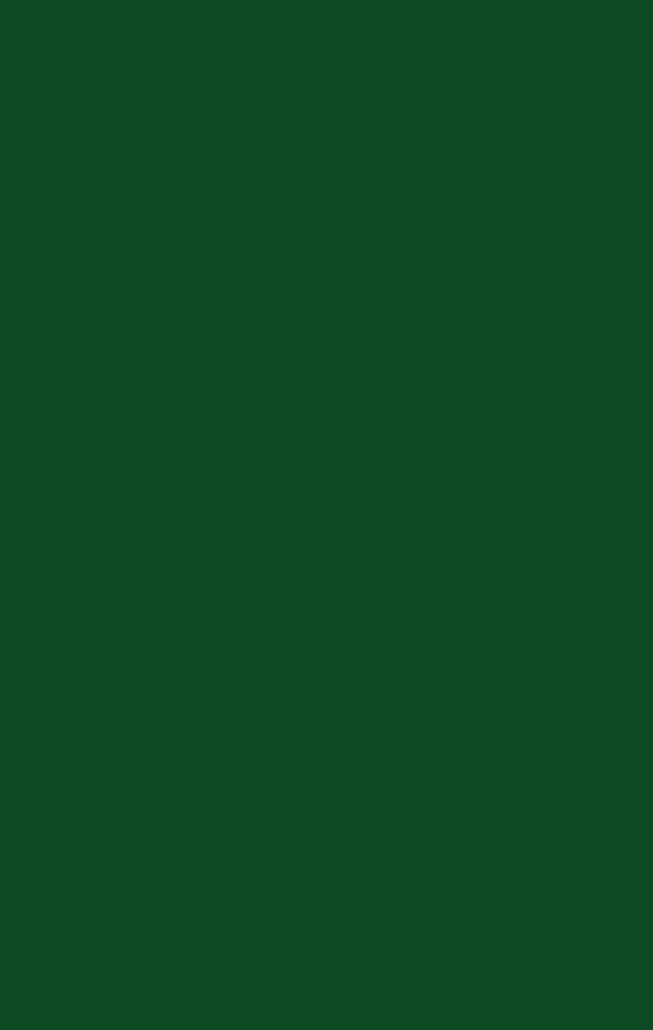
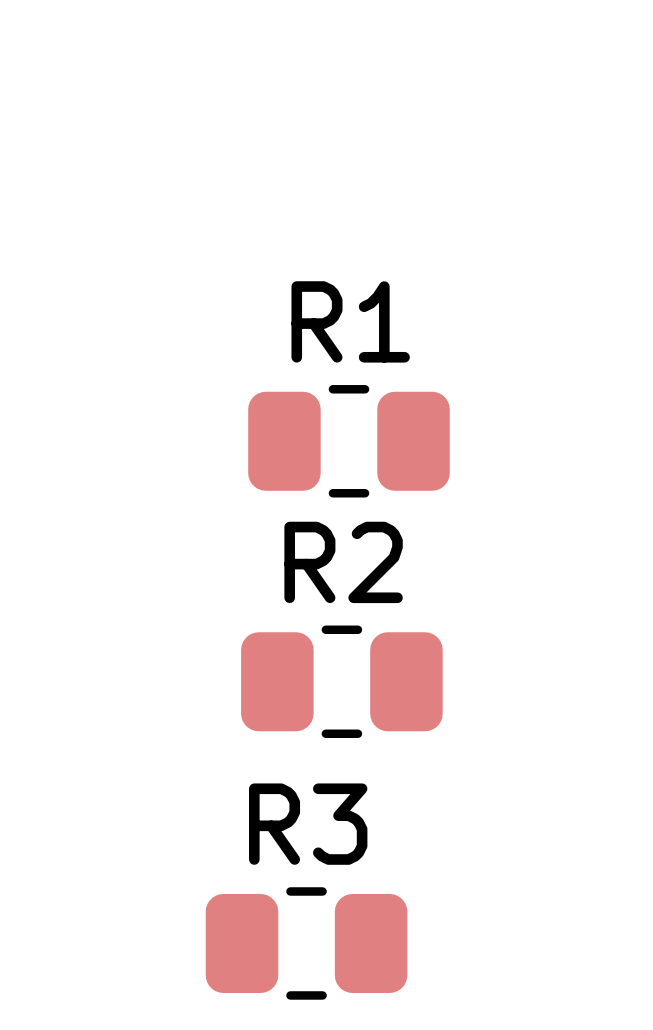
R1: none -> (348, 441)
R2: none -> (341, 681)
R3: none -> (306, 943)

